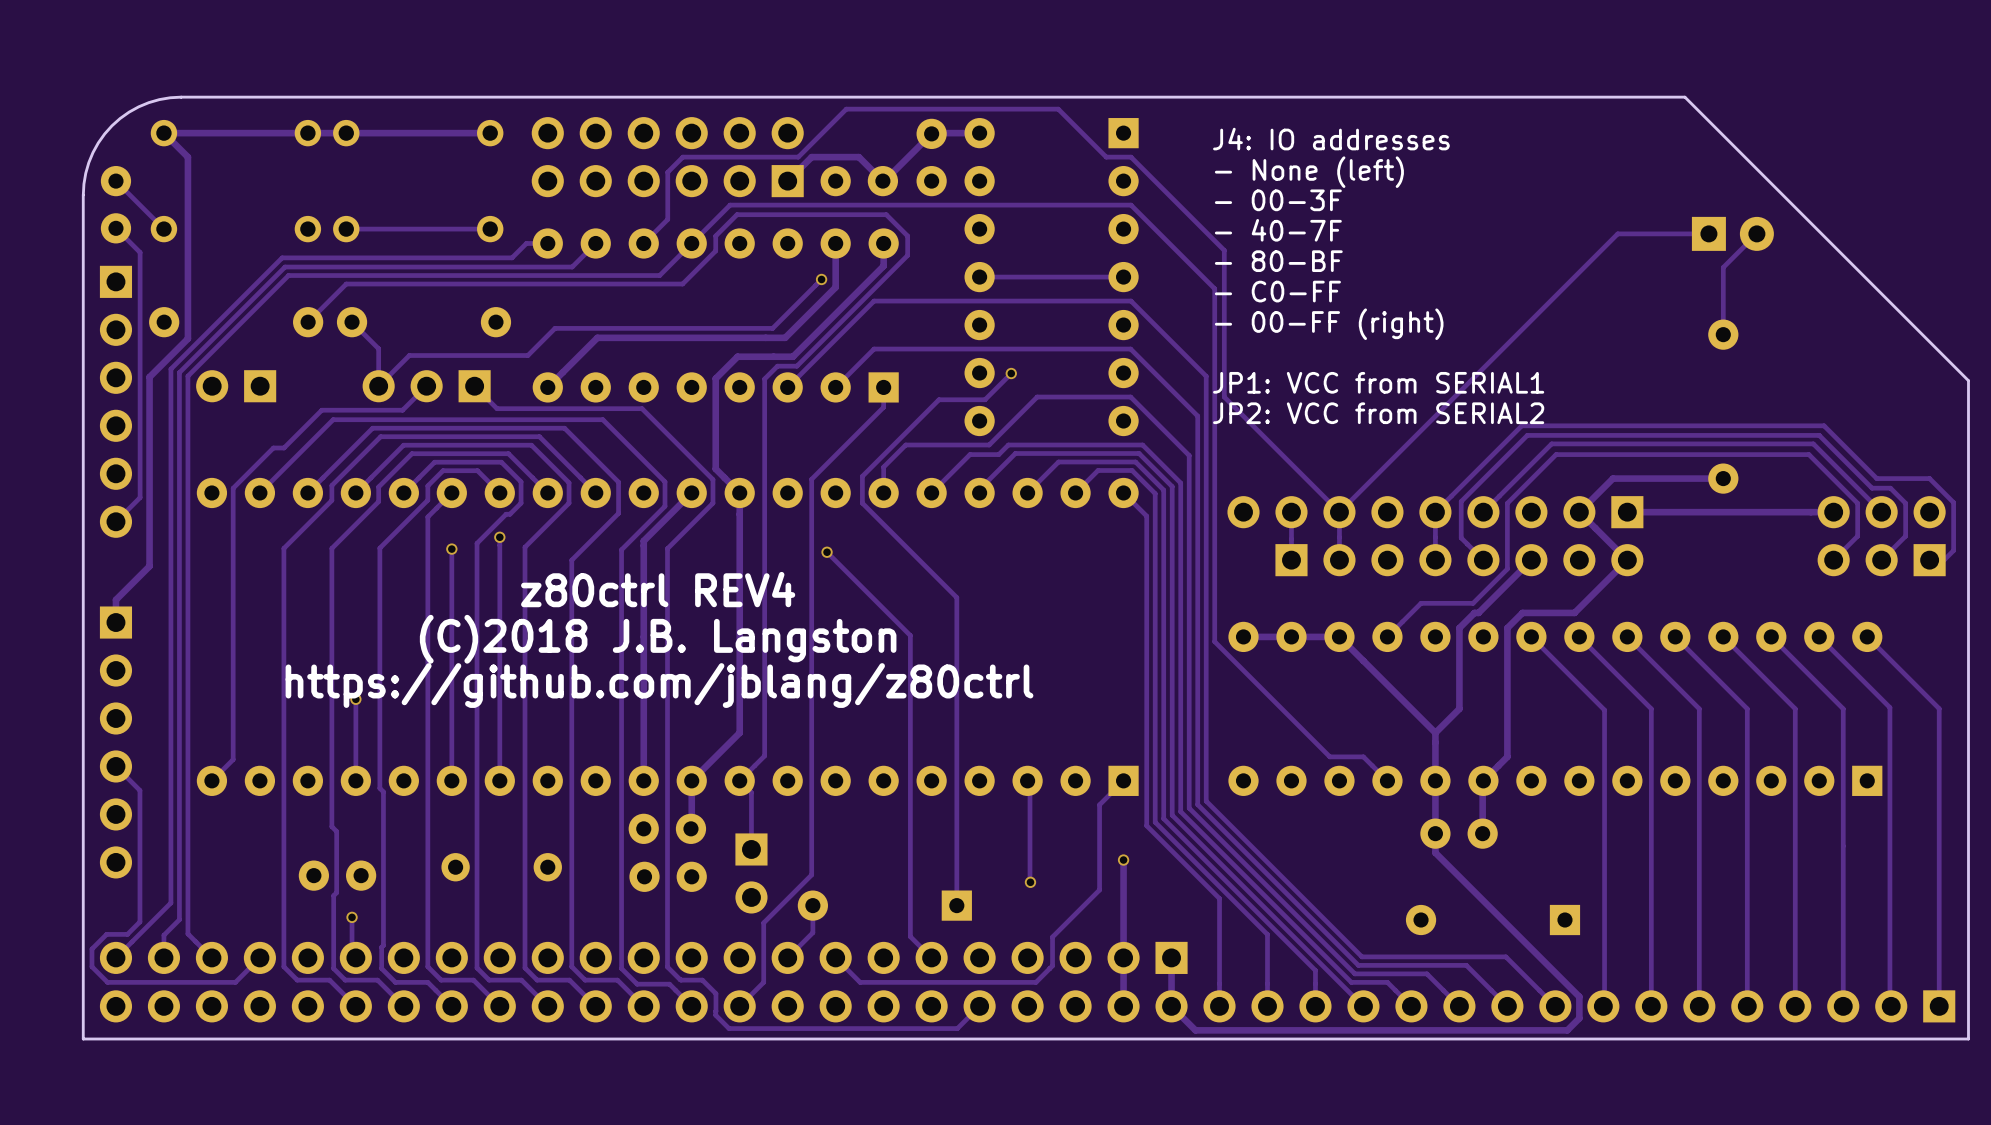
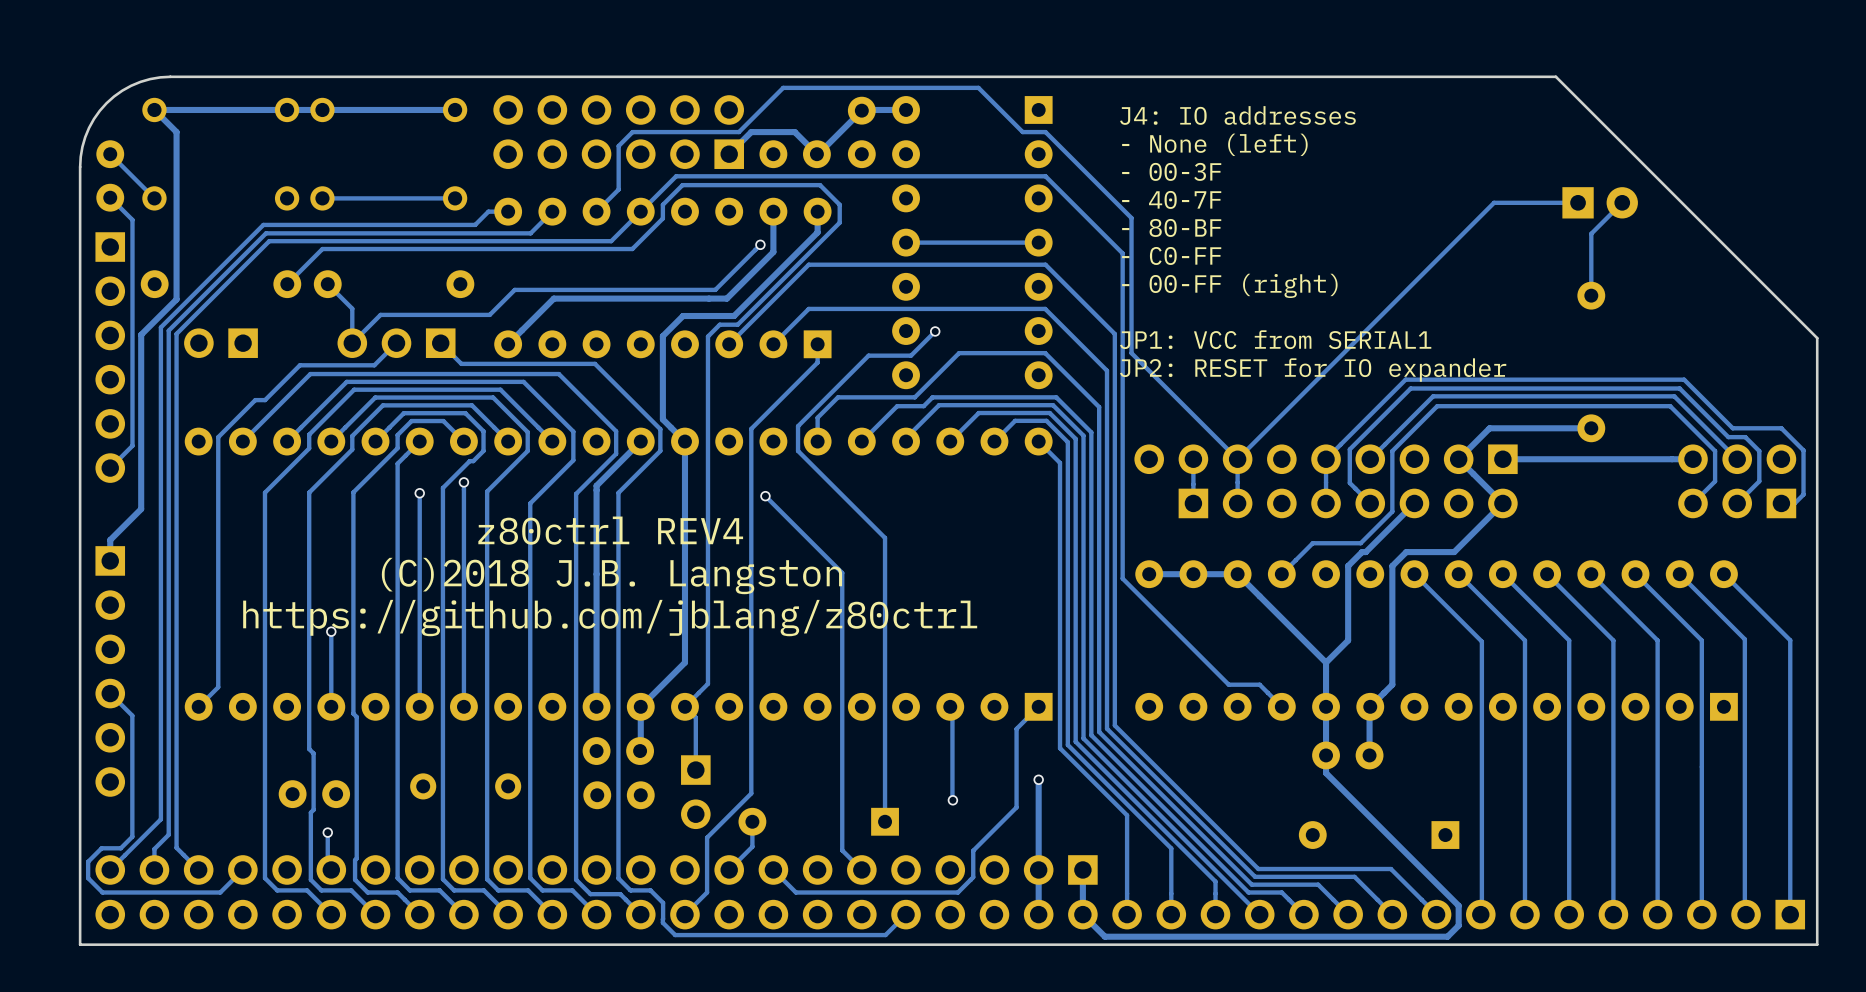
text: JP2: VCC from SERIAL2 (1378, 413) -> JP2: RESET for IO expander (1313, 370)

